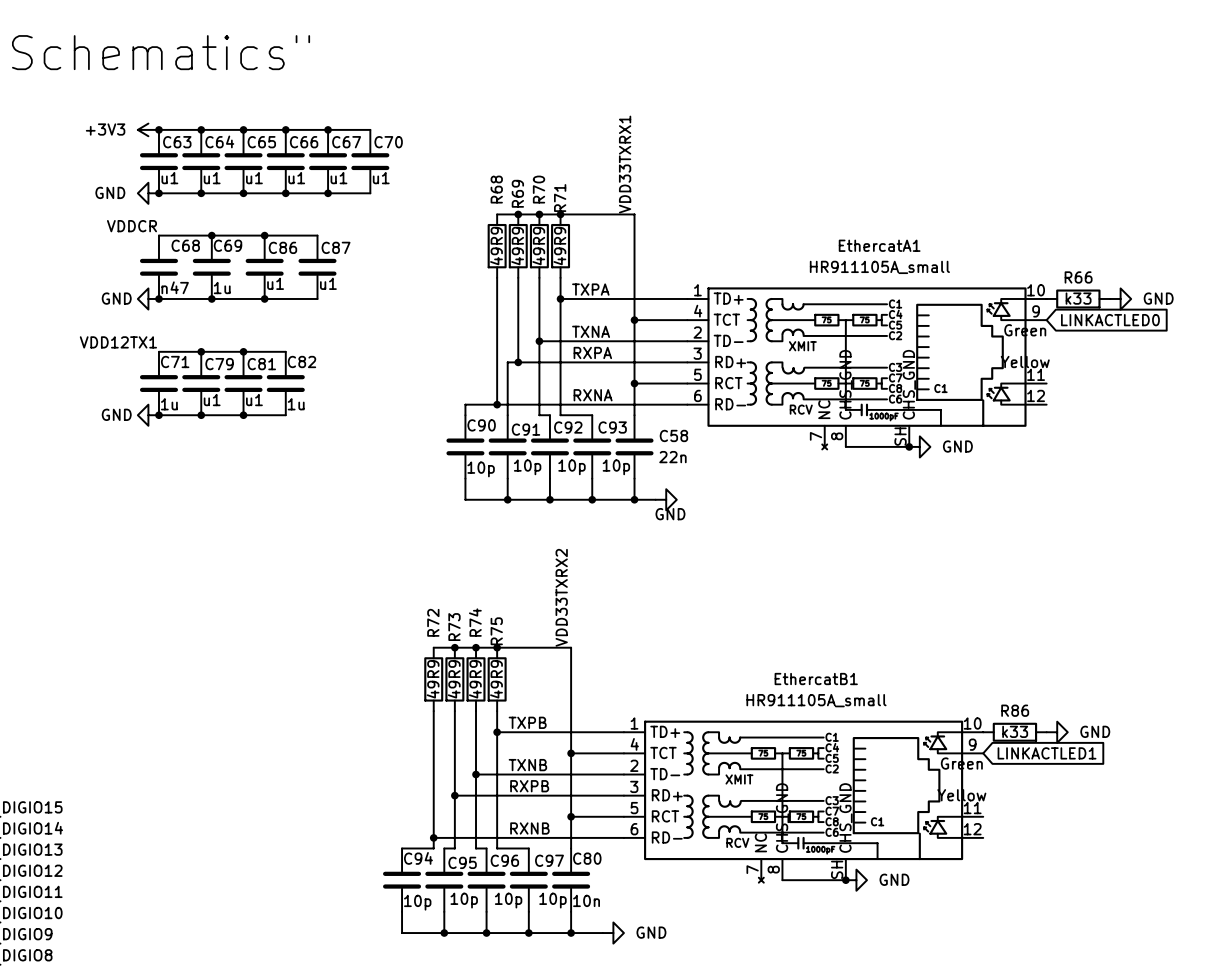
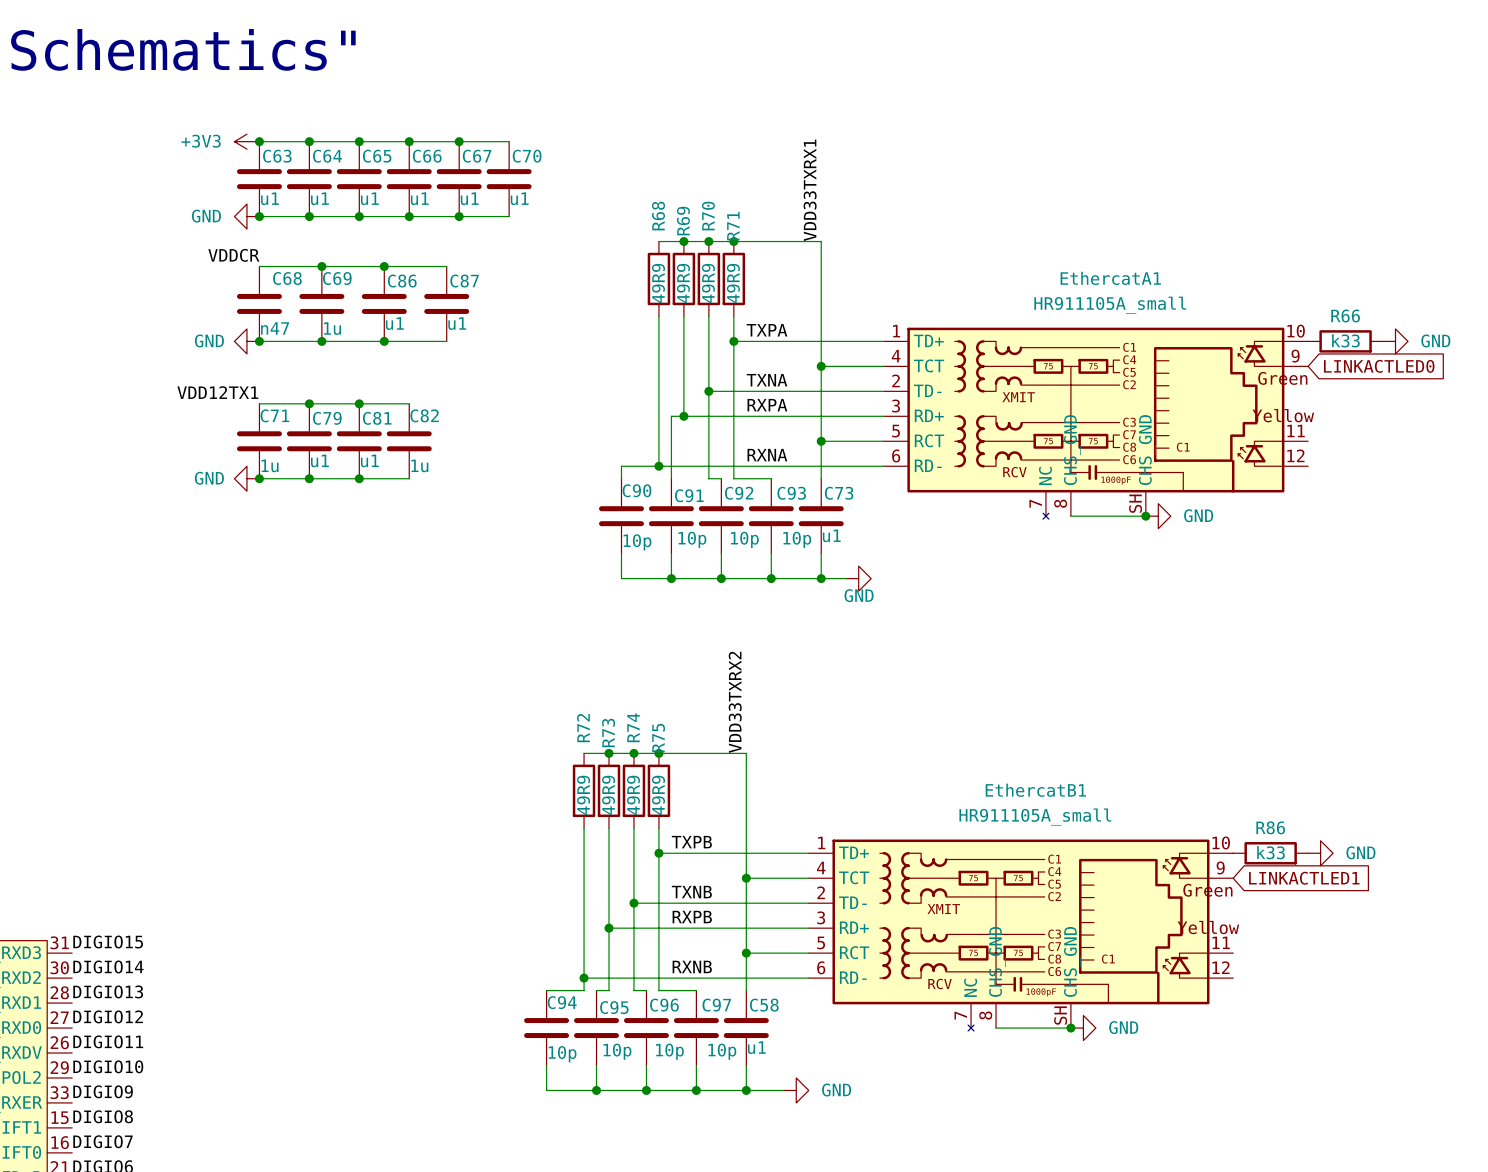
C58 name: C58 (673, 435) -> C73 (839, 493)
C58 value: 22n (672, 457) -> u1 (831, 535)
C80 name: C80 (587, 858) -> C58 (764, 1005)
C80 value: 10n (586, 900) -> u1 (756, 1047)

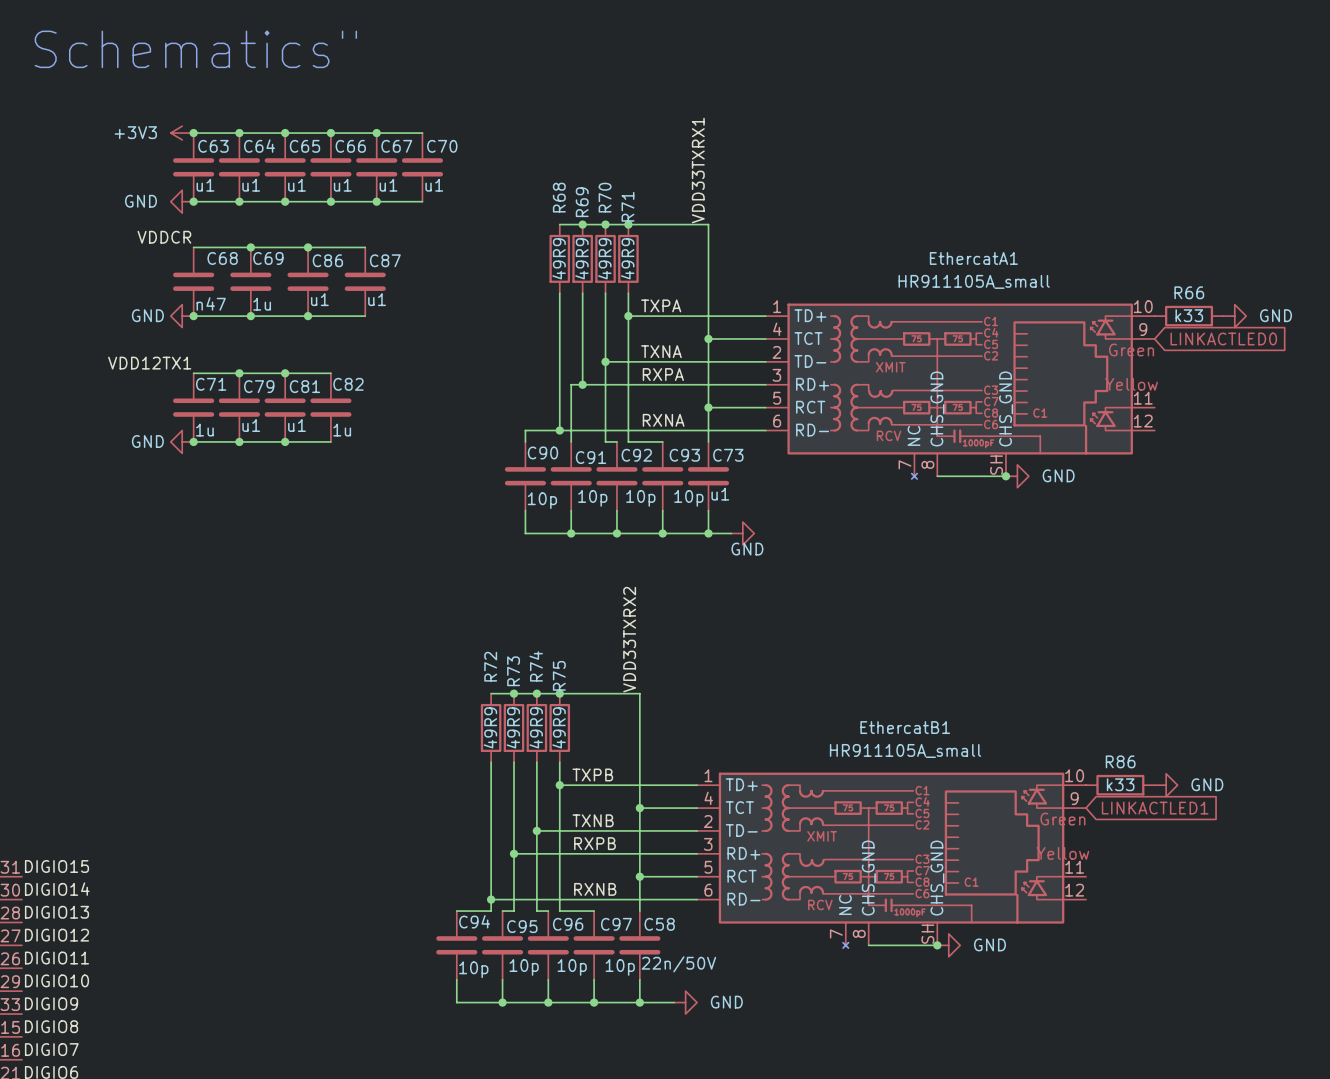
C58 value: u1 (756, 1047) -> 22n/50V (678, 964)

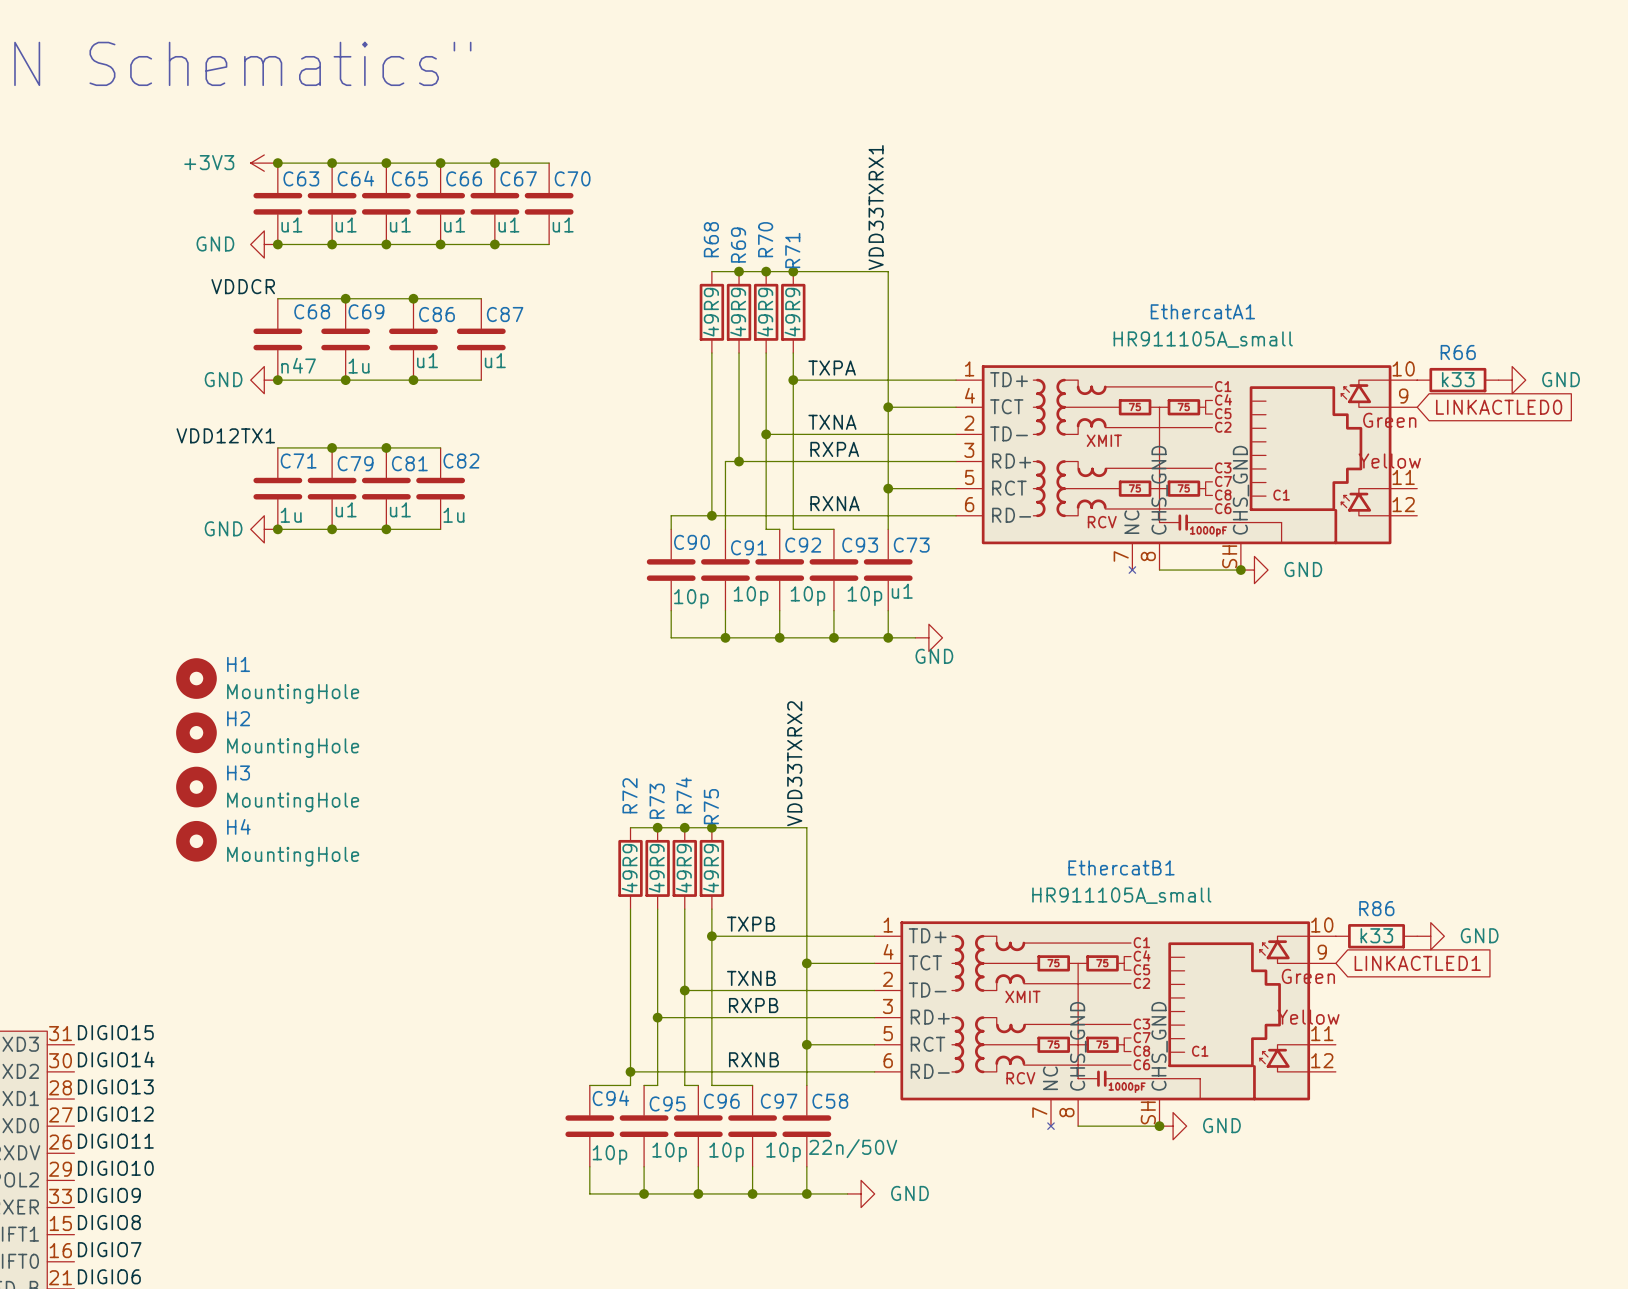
H1: none -> MountingHole (196, 678)
H2: none -> MountingHole (196, 732)
H3: none -> MountingHole (196, 787)
H4: none -> MountingHole (196, 841)

